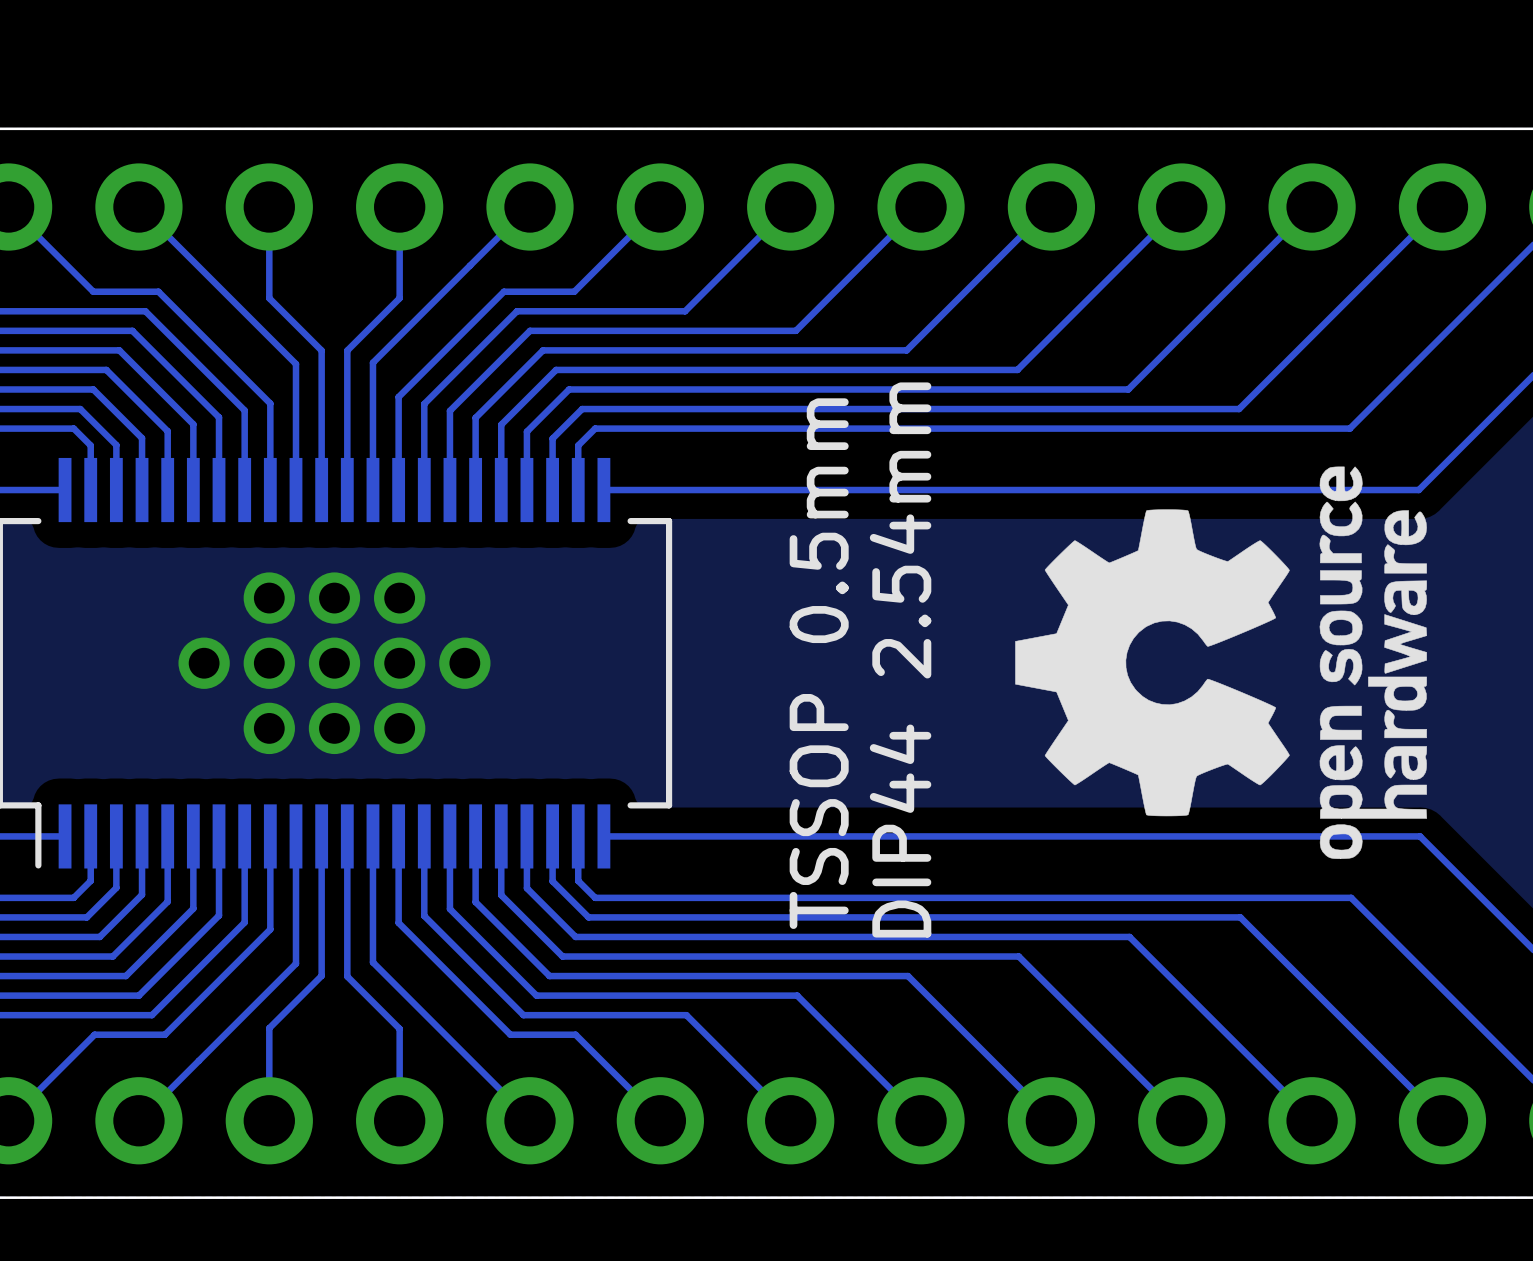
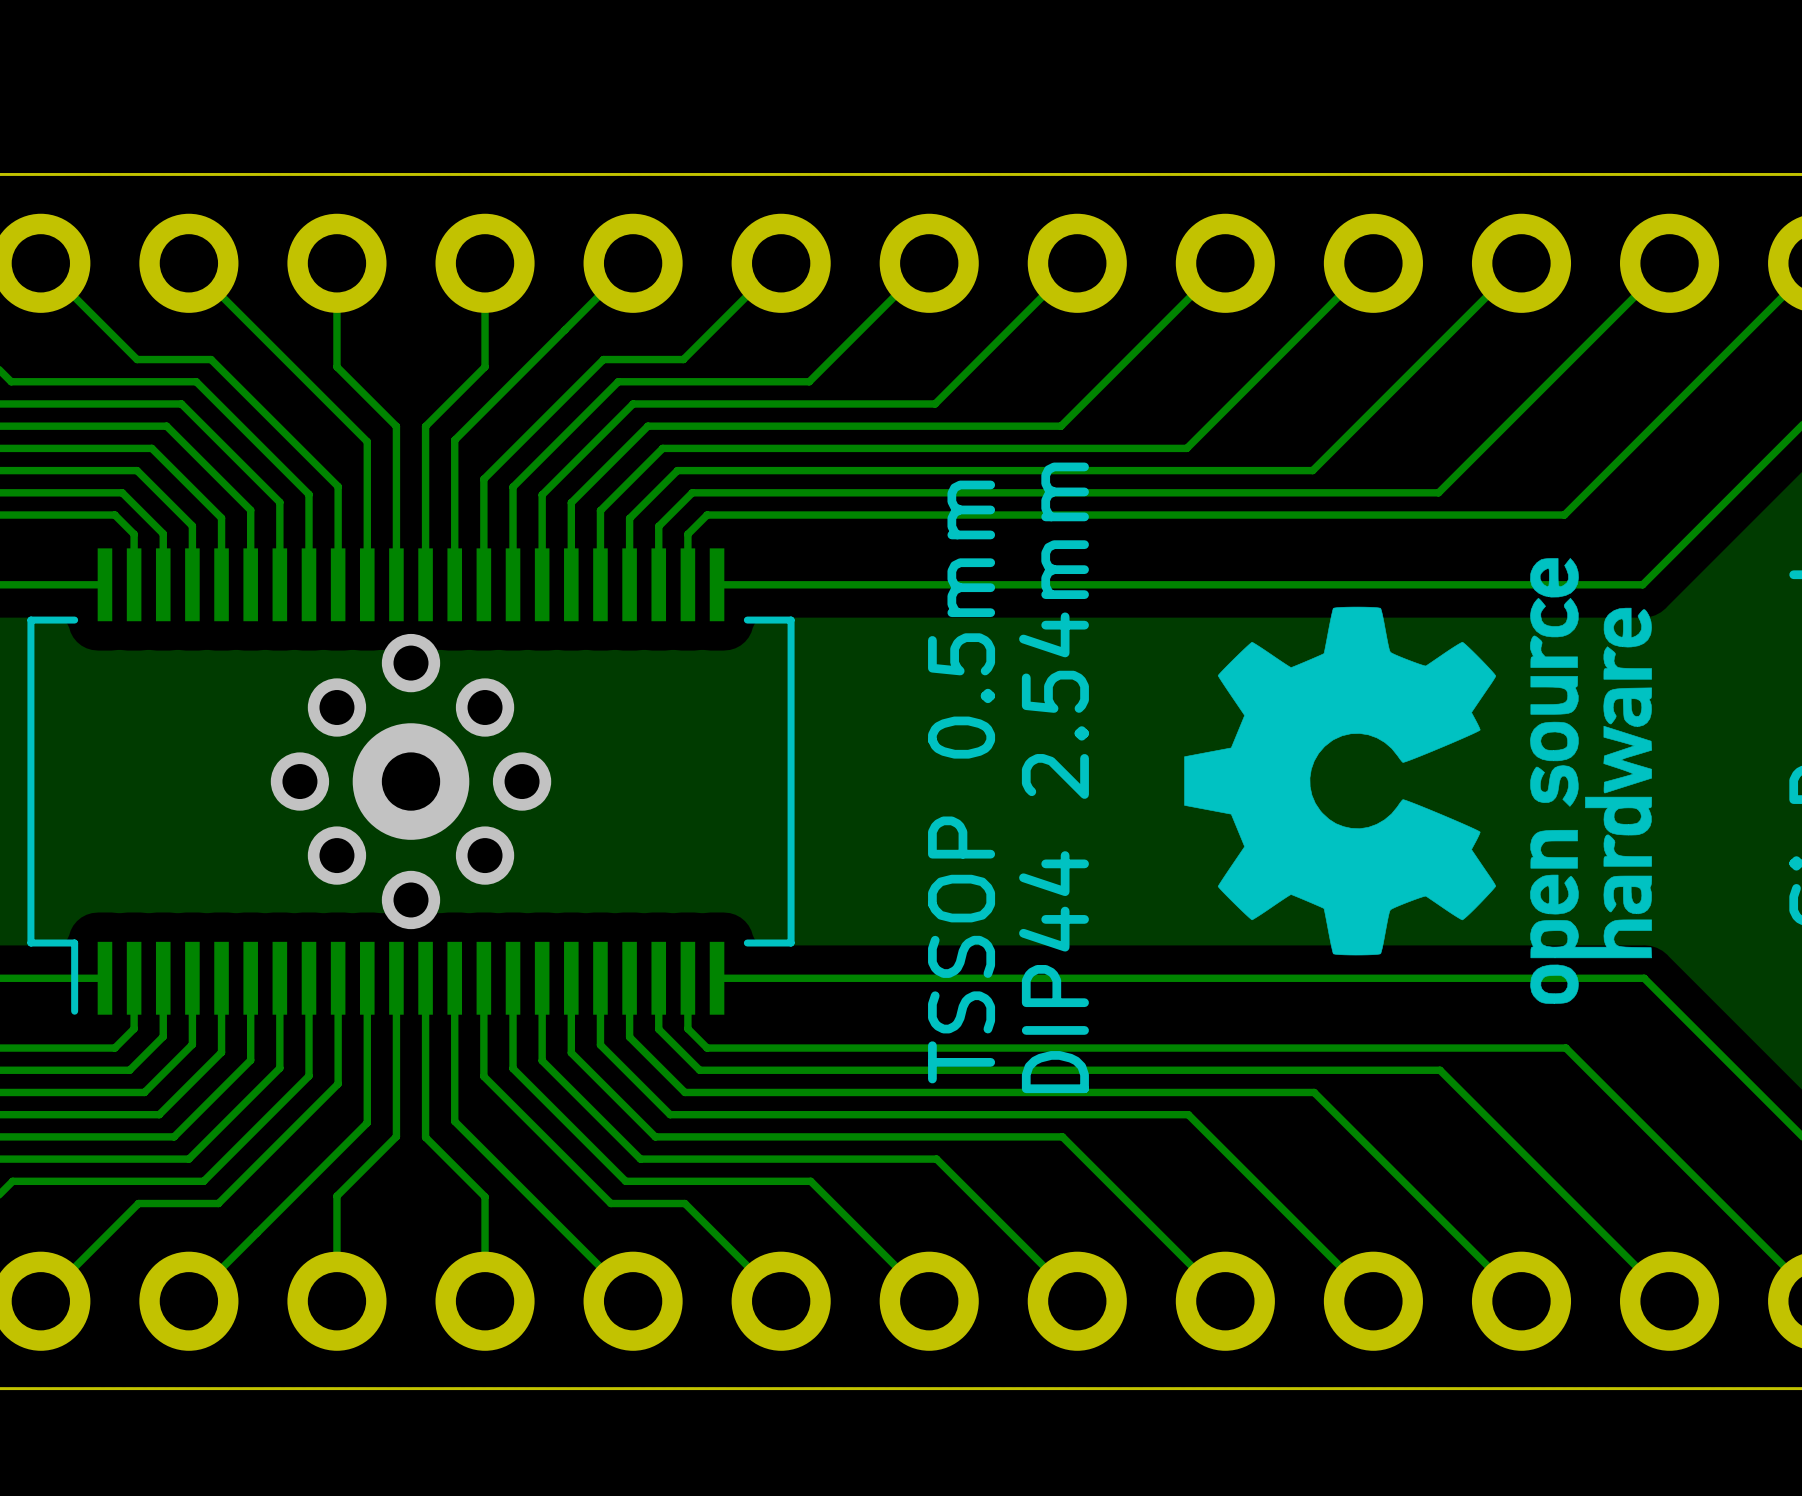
via position: (334, 598) -> (411, 663)
via size: [308, 637, 361, 689] -> [352, 723, 470, 840]
via: (204, 663) -> none
via: none -> (299, 781)
via: (269, 663) -> none
via: (399, 663) -> none
via: none -> (522, 781)
via: (464, 663) -> none
via position: (334, 728) -> (411, 899)

